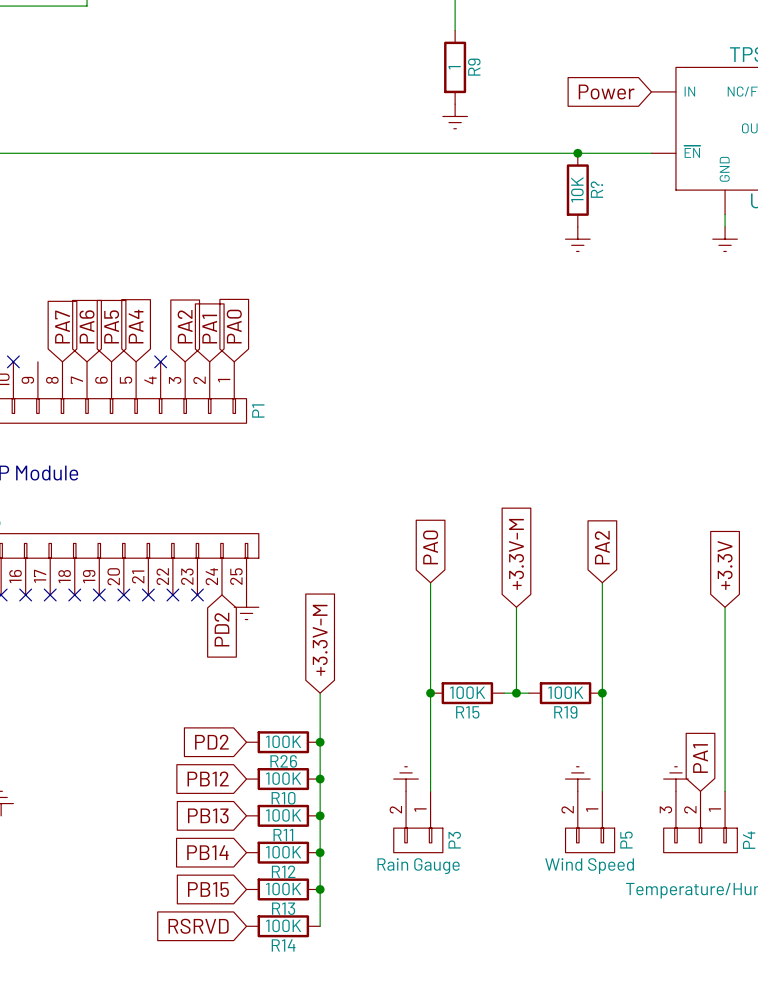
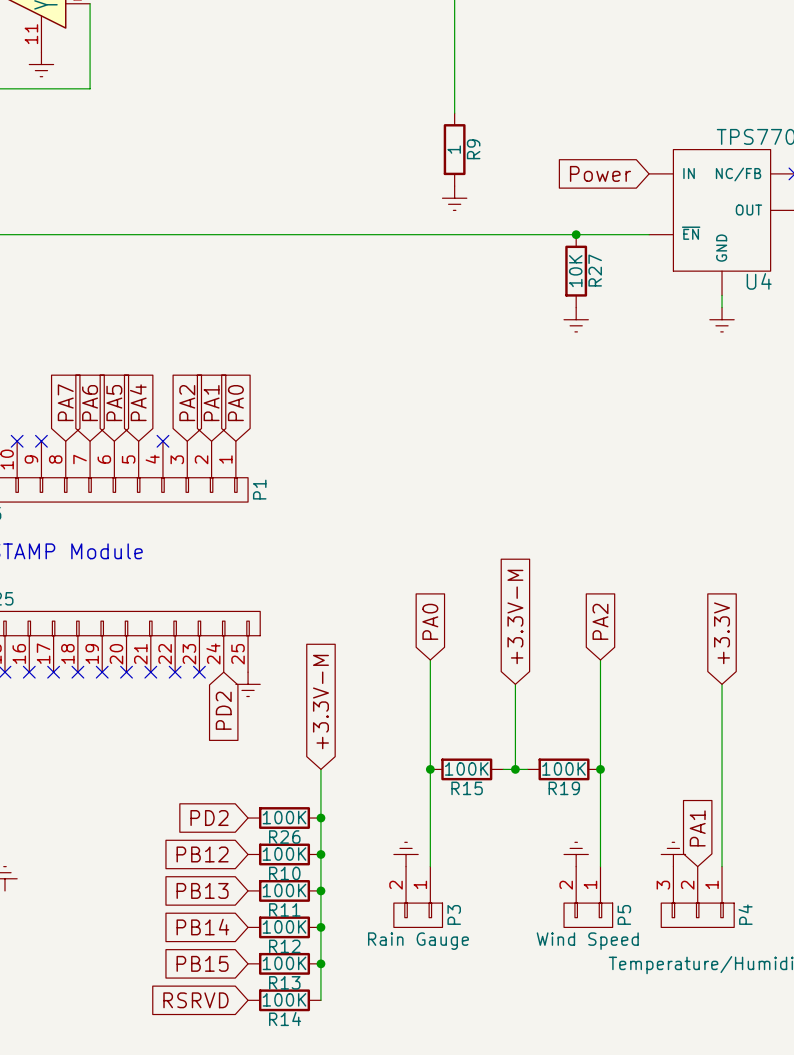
R? name: R? (596, 189) -> R27 (595, 270)
no-connect mark: none -> (41, 441)

